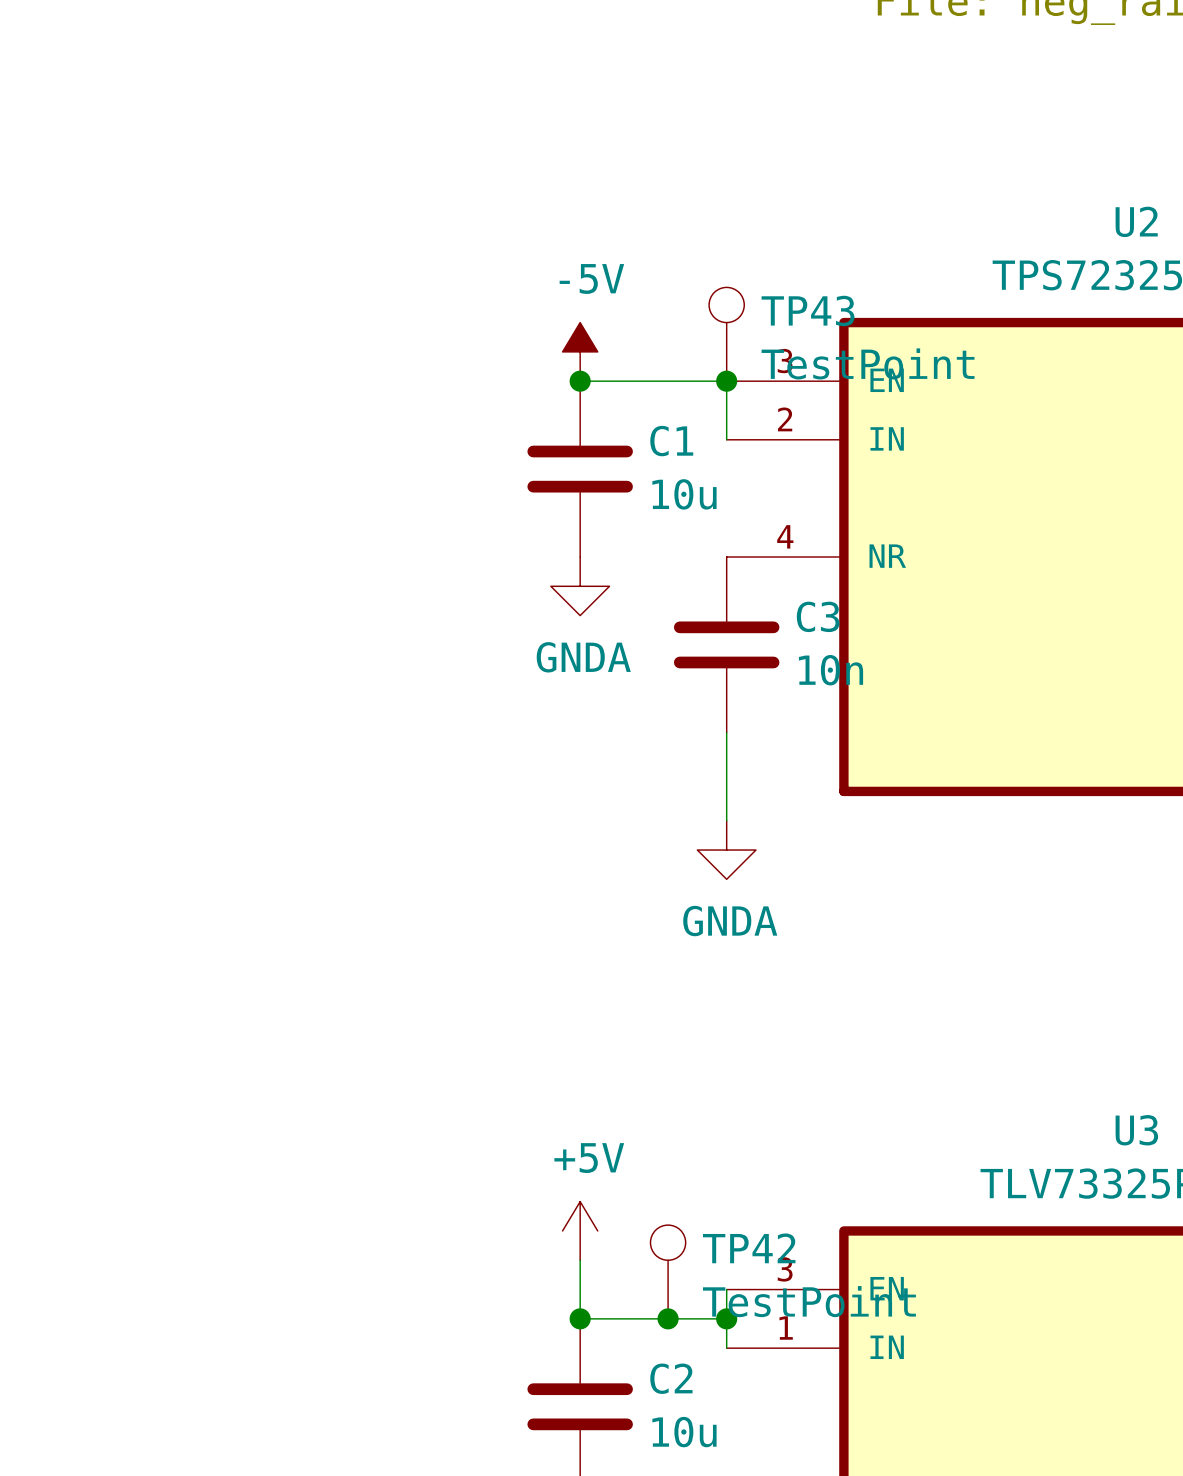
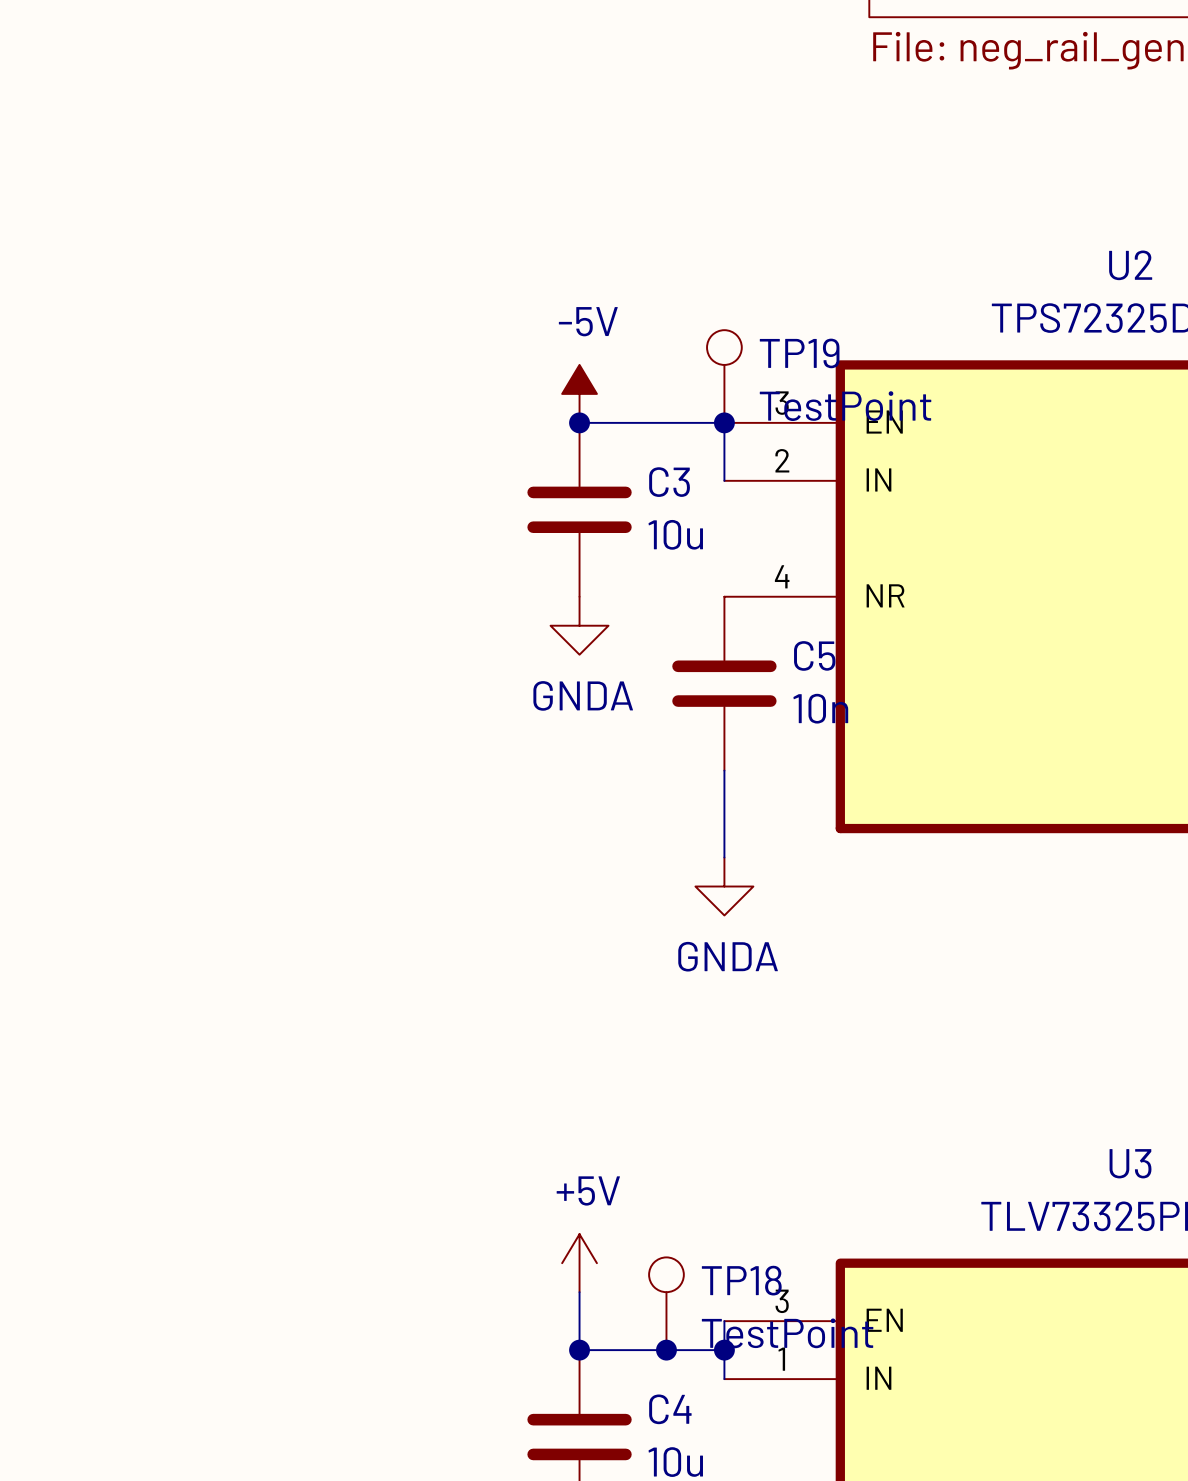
TP43 name: TP43 (808, 310) -> TP19 (799, 353)
C1 name: C1 (671, 441) -> C3 (669, 482)
C3 name: C3 (818, 616) -> C5 (814, 655)
TP42 name: TP42 (749, 1248) -> TP18 (741, 1280)
C2 name: C2 (671, 1378) -> C4 (670, 1409)

